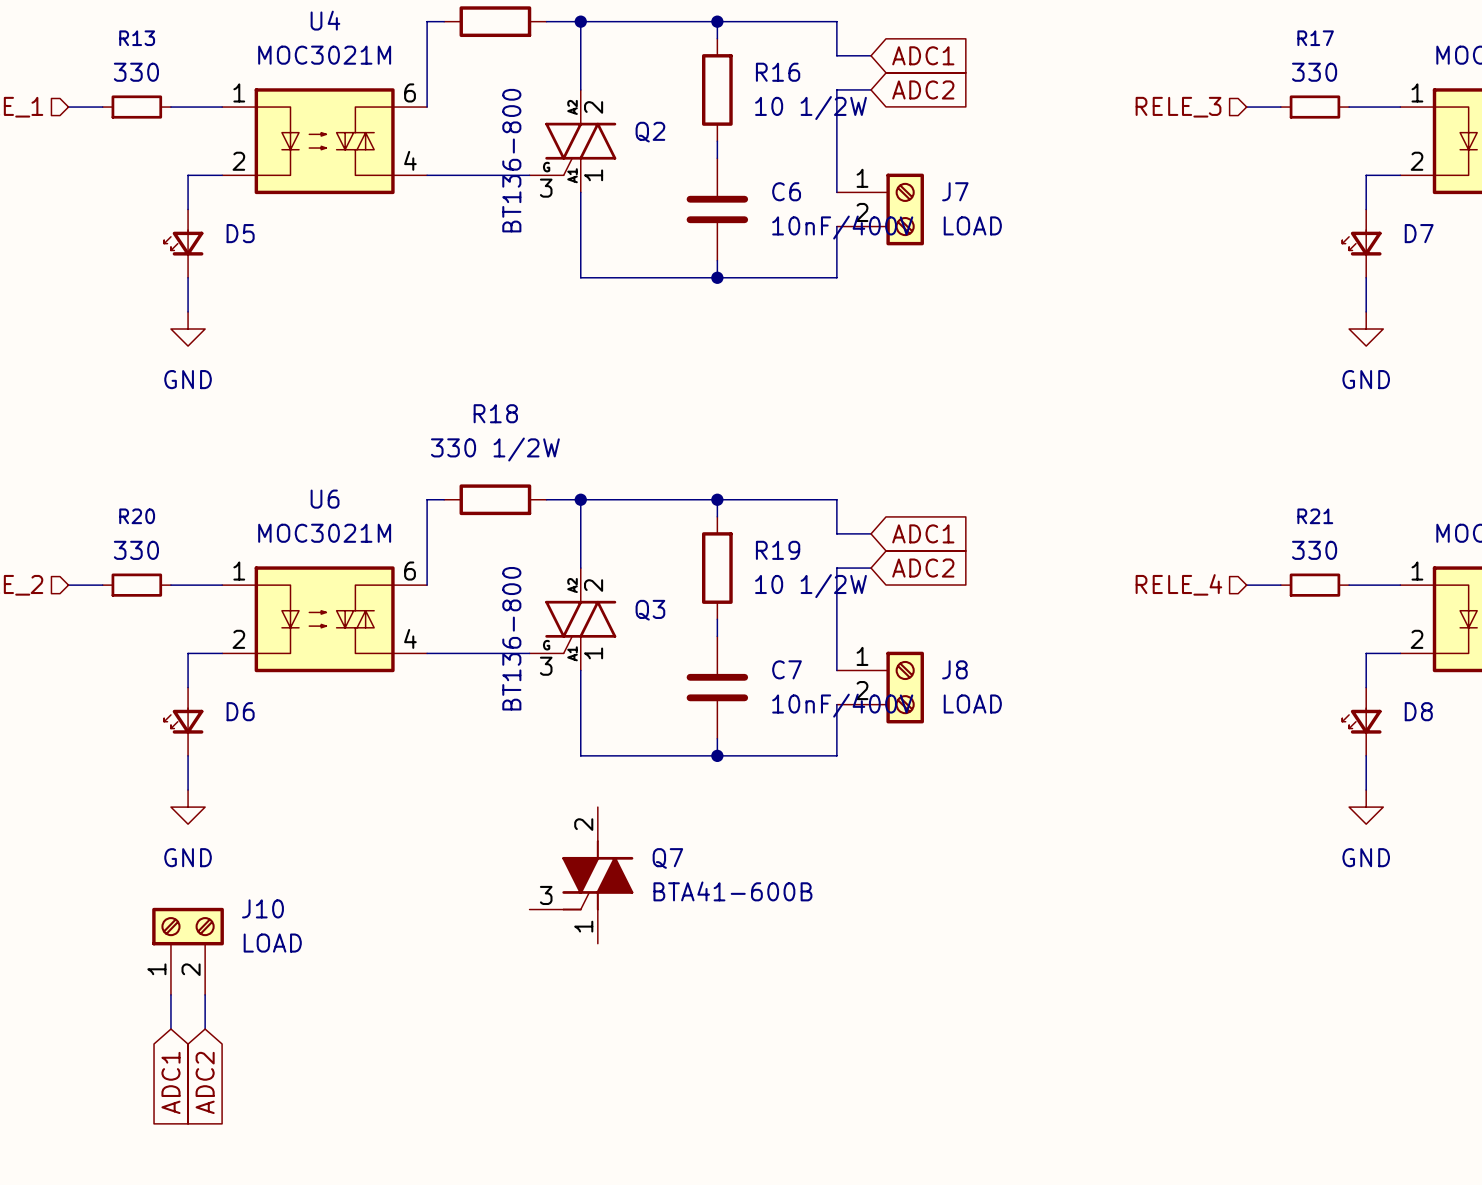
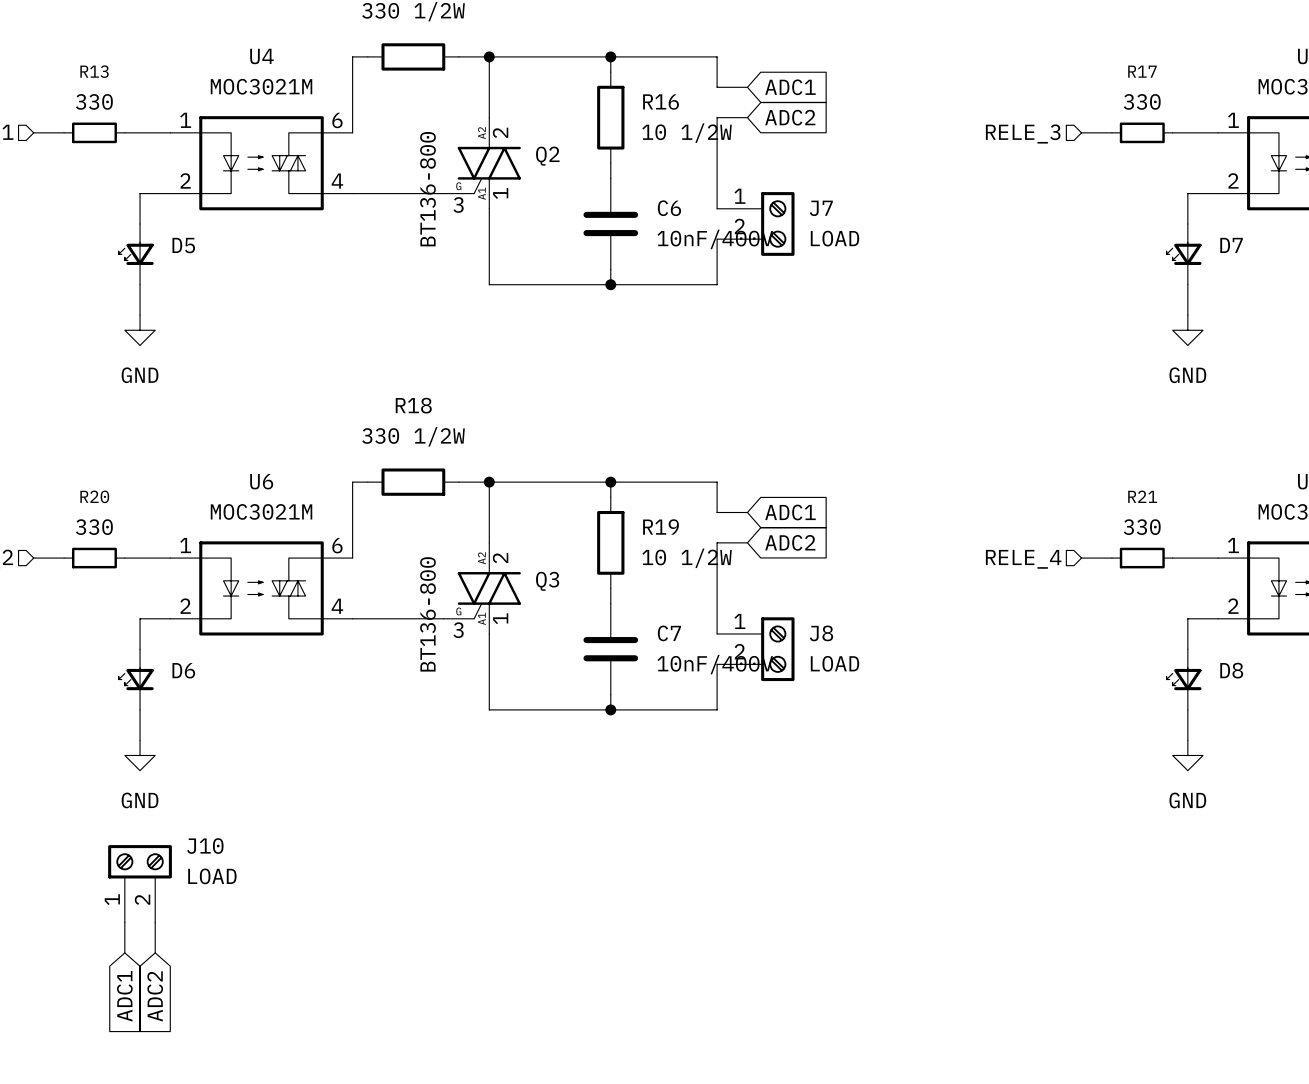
Q7: BTA41-600B (581, 875) -> none

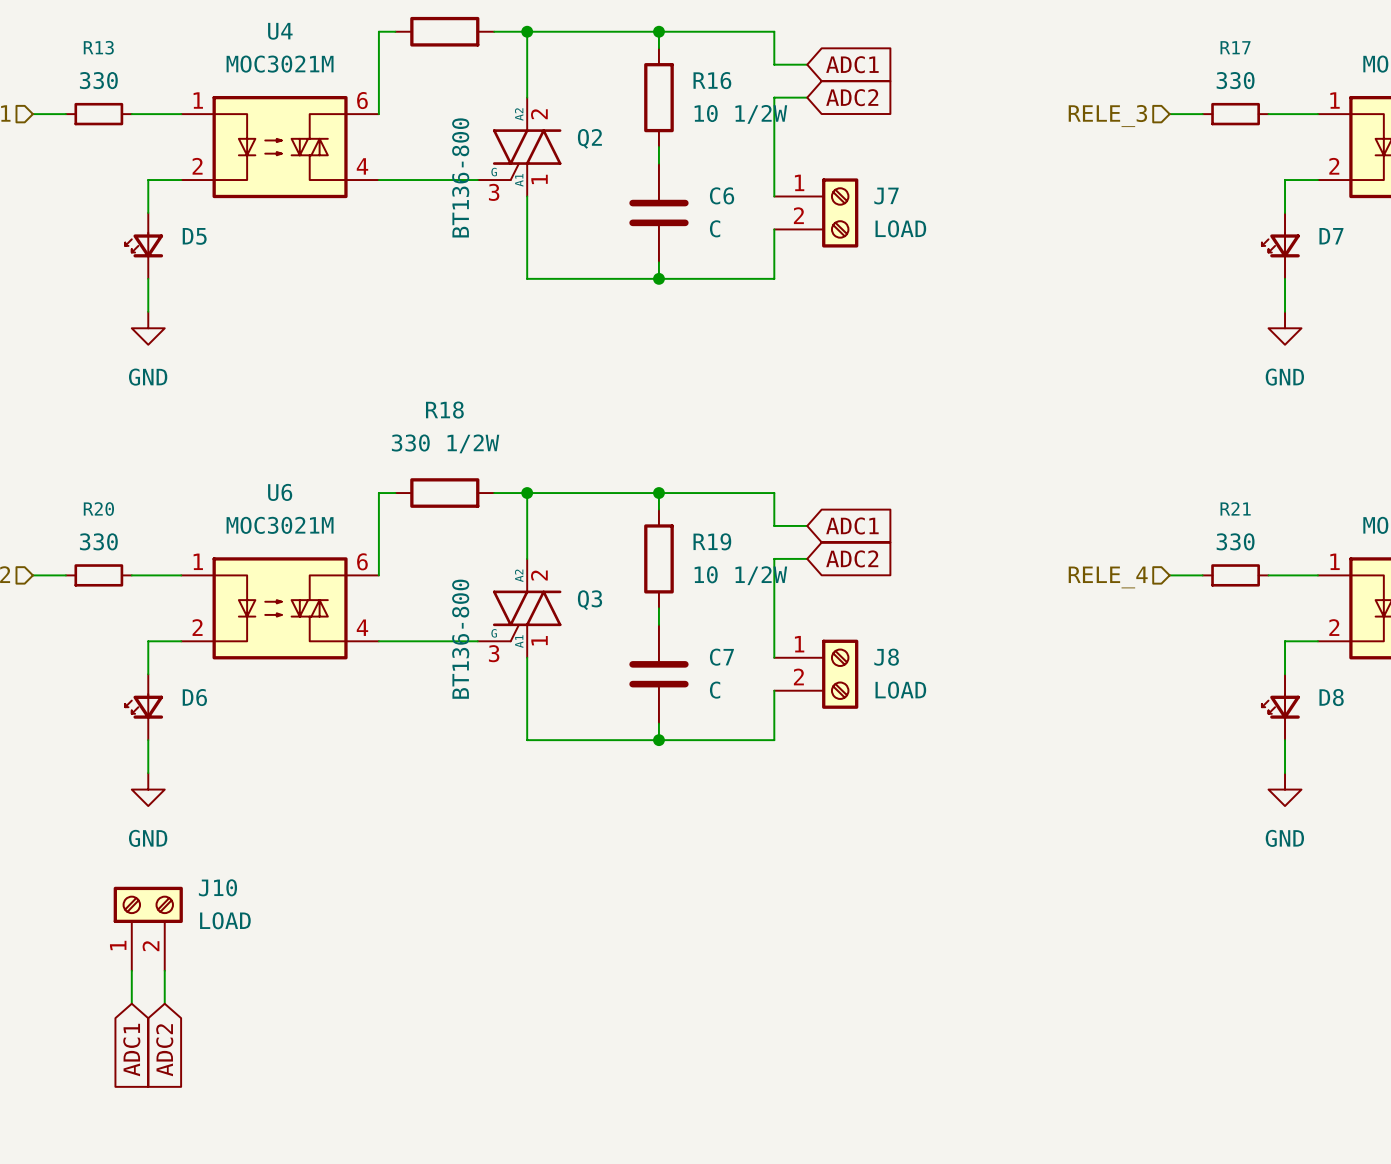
C6 value: 10nF/400V (715, 239) -> C (715, 228)
C7 value: 10nF/400V (715, 664) -> C (715, 690)

